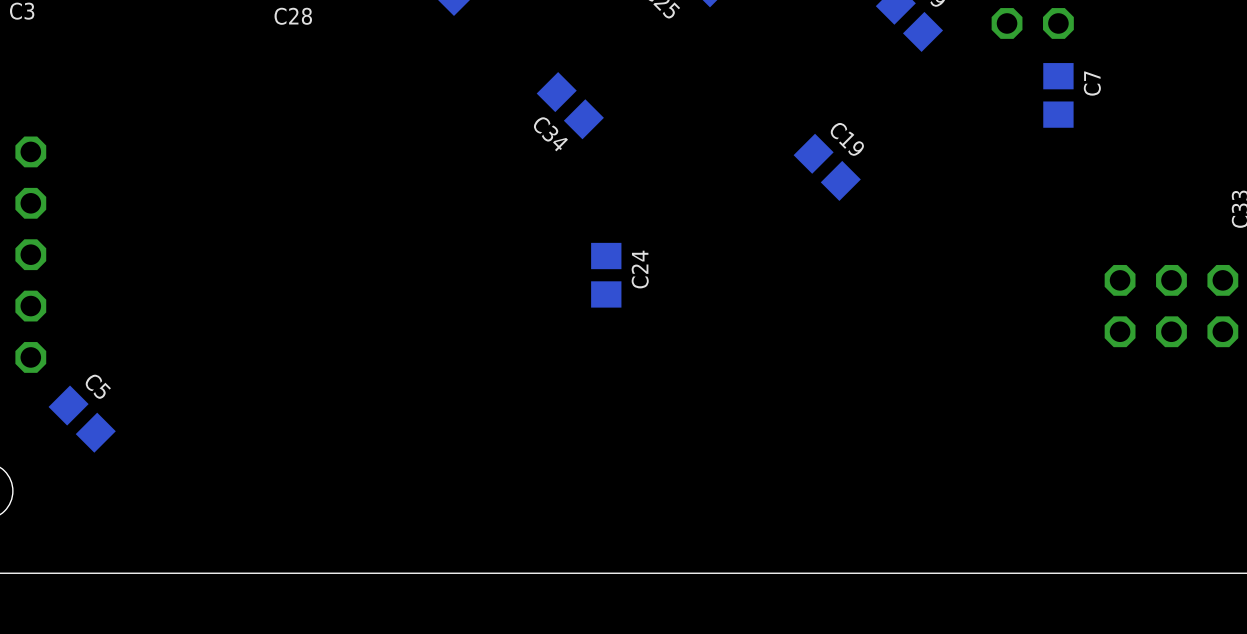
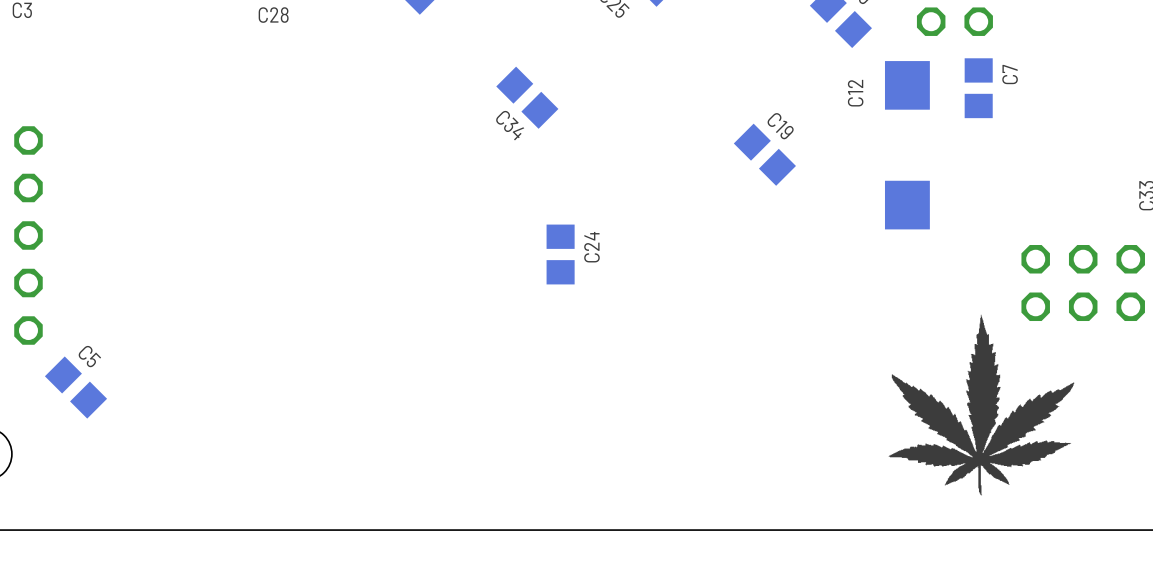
C12: none -> (907, 145)
drawing: none -> [888, 314, 1075, 496]

